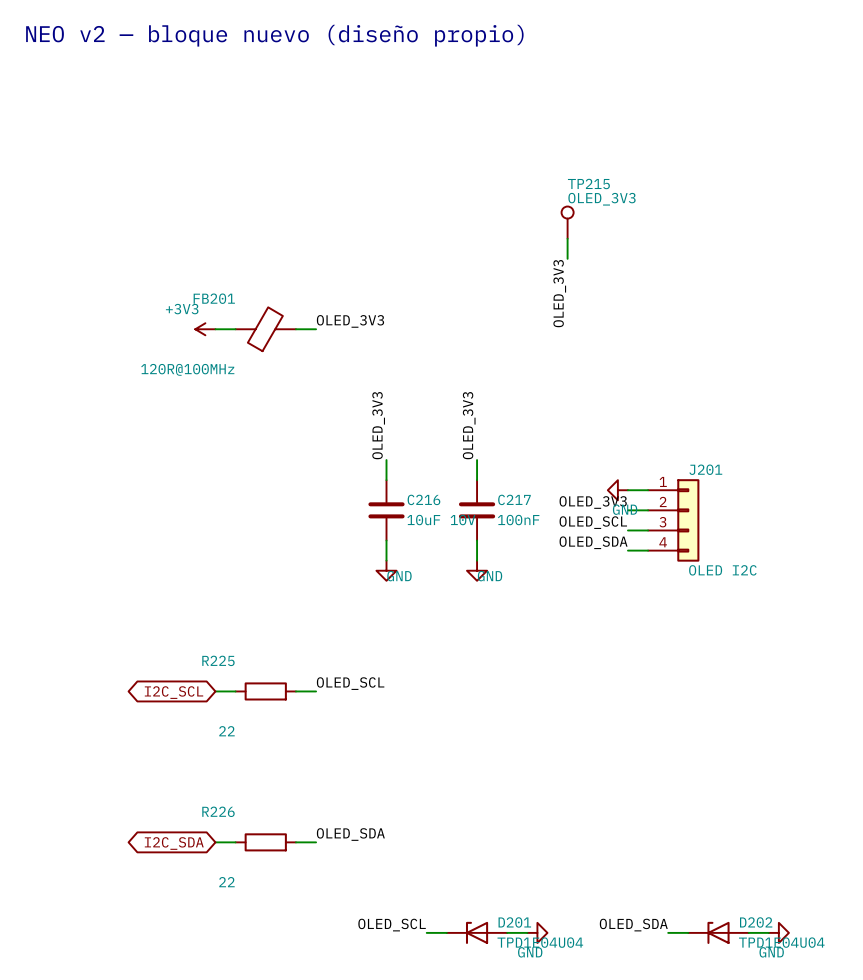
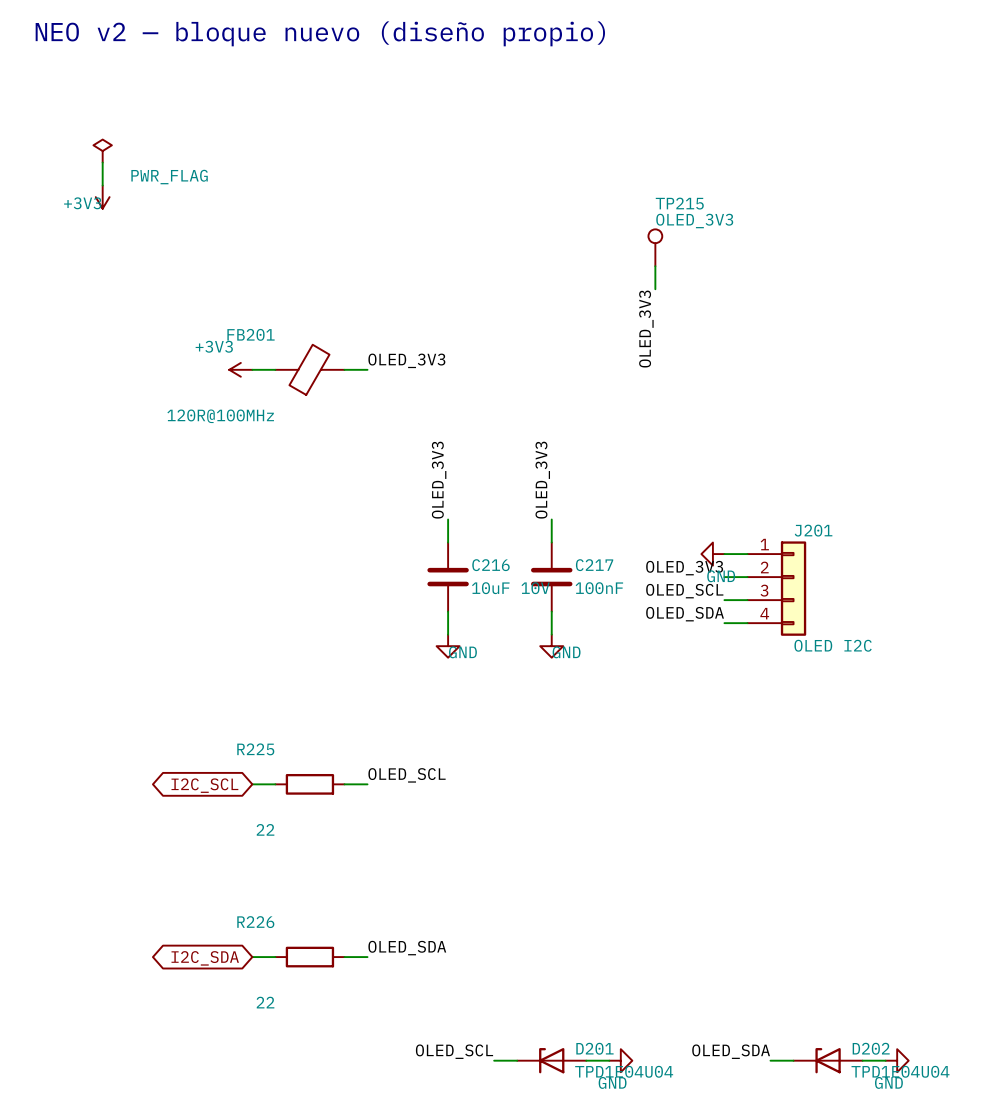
power symbol: none -> PWR_FLAG (102, 151)
wire: none -> (102, 162) (102, 185)
power symbol: none -> +3V3 (102, 197)

